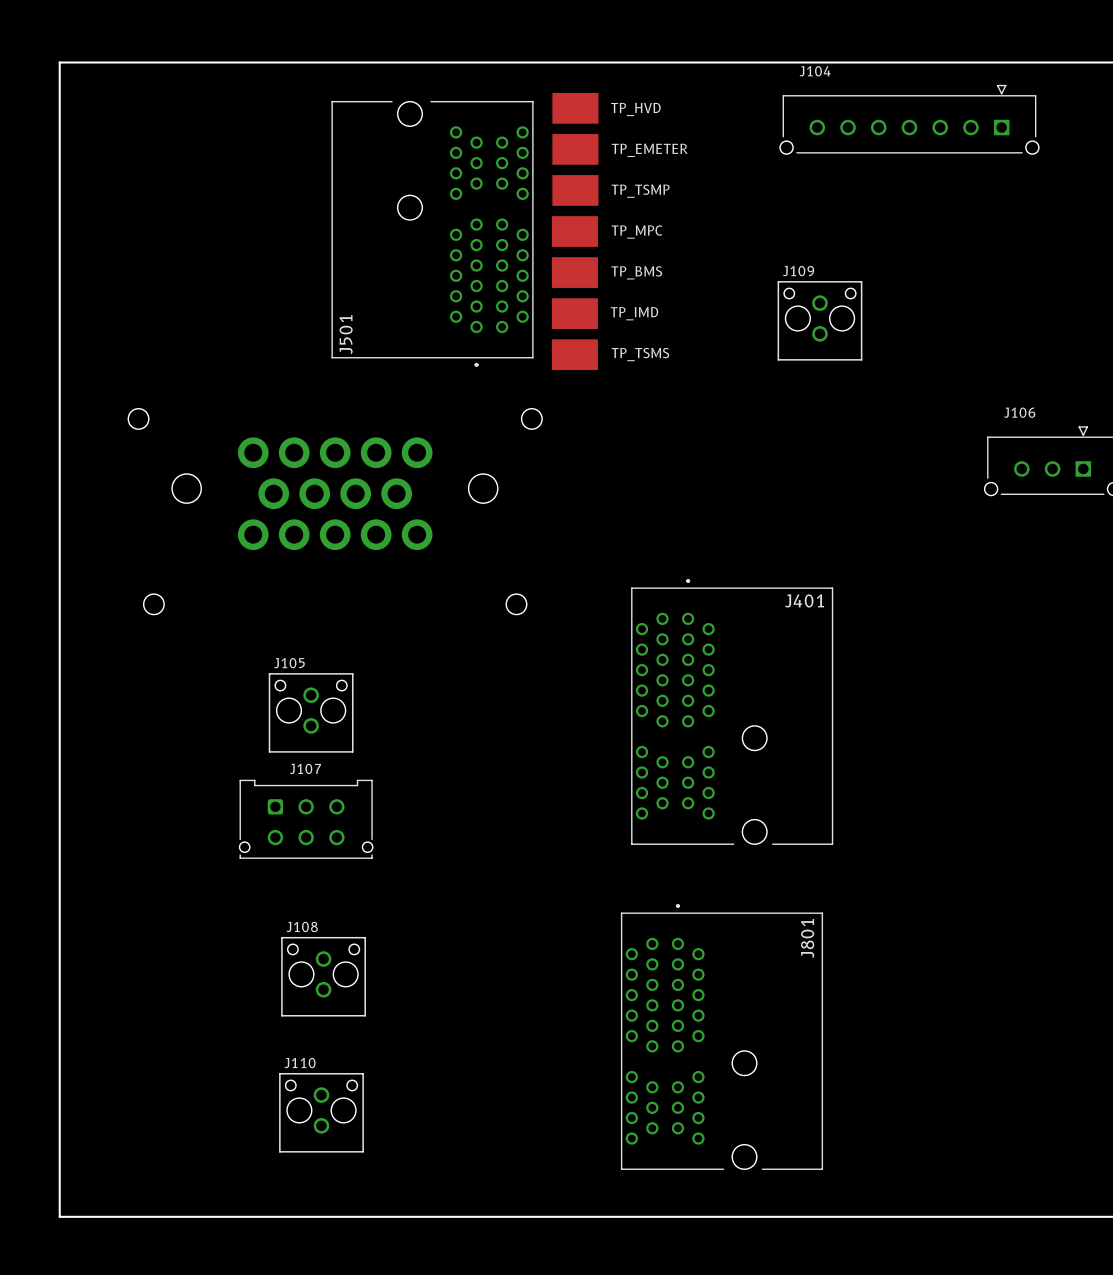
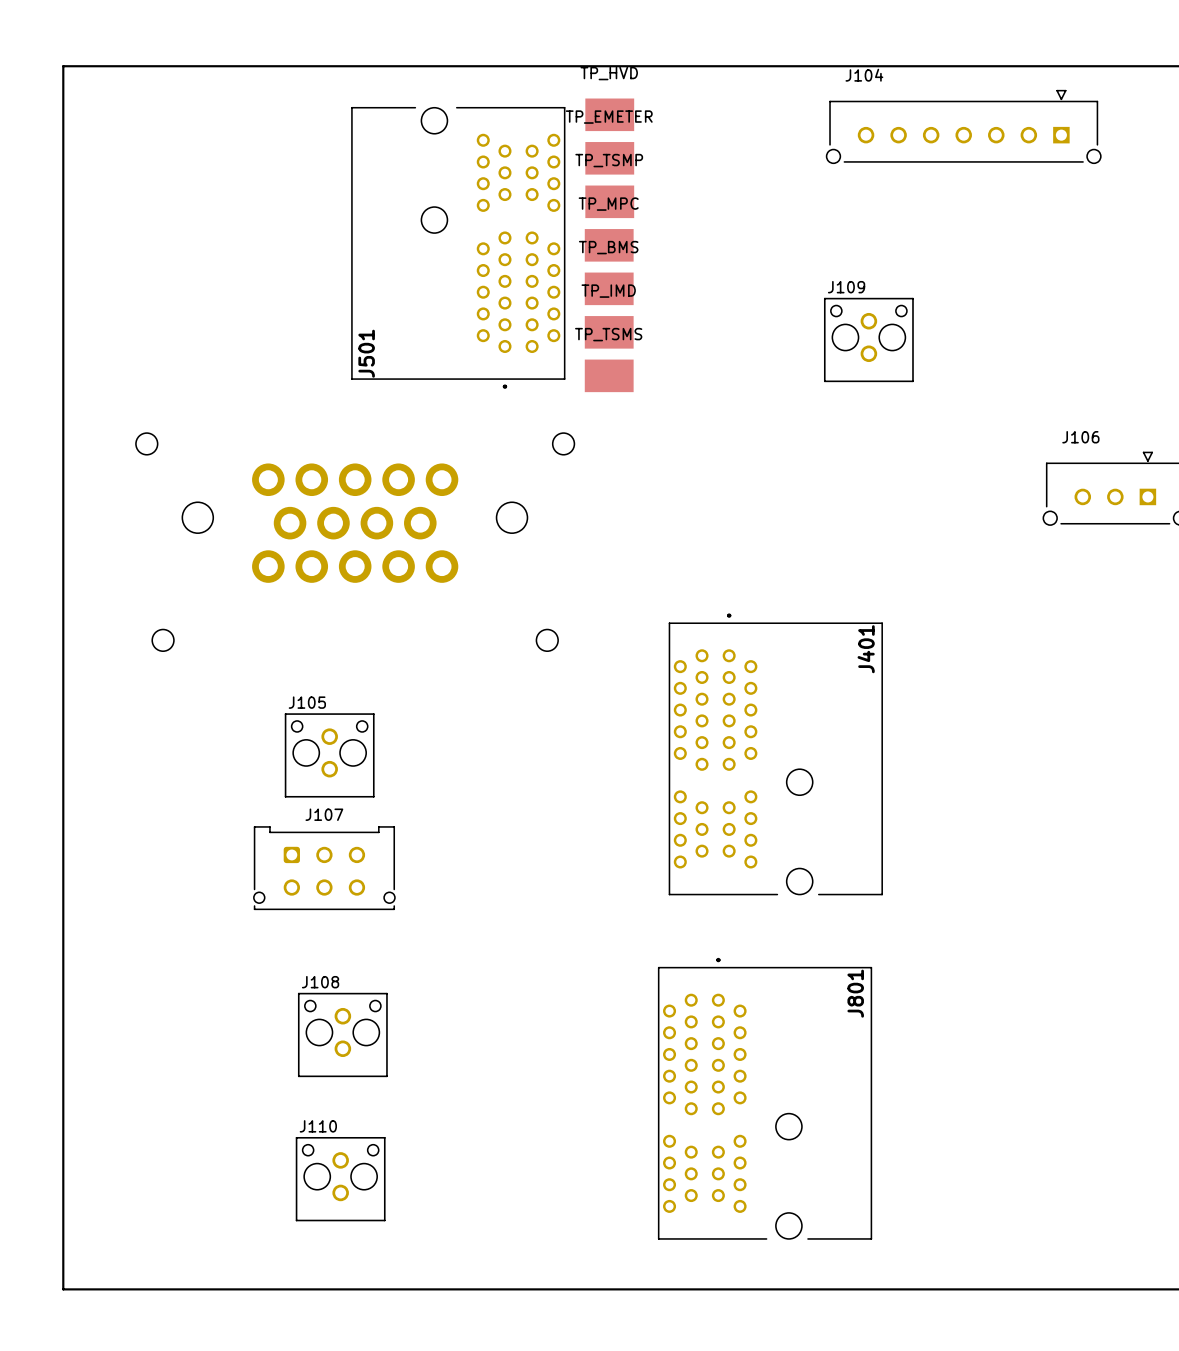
part value position: TP_HVD (635, 109) -> TP_HVD (609, 73)
part value position: TP_EMETER (649, 150) -> TP_EMETER (609, 117)
part value position: TP_TSMP (640, 191) -> TP_TSMP (609, 160)
part value position: TP_MPC (637, 232) -> TP_MPC (608, 204)
part value position: TP_BMS (636, 272) -> TP_BMS (608, 247)
part value position: TP_IMD (634, 313) -> TP_IMD (608, 291)
part value position: TP_TSMS (640, 354) -> TP_TSMS (608, 334)
J401 name rotation: 0° (804, 600) -> 90° counterclockwise (866, 649)

